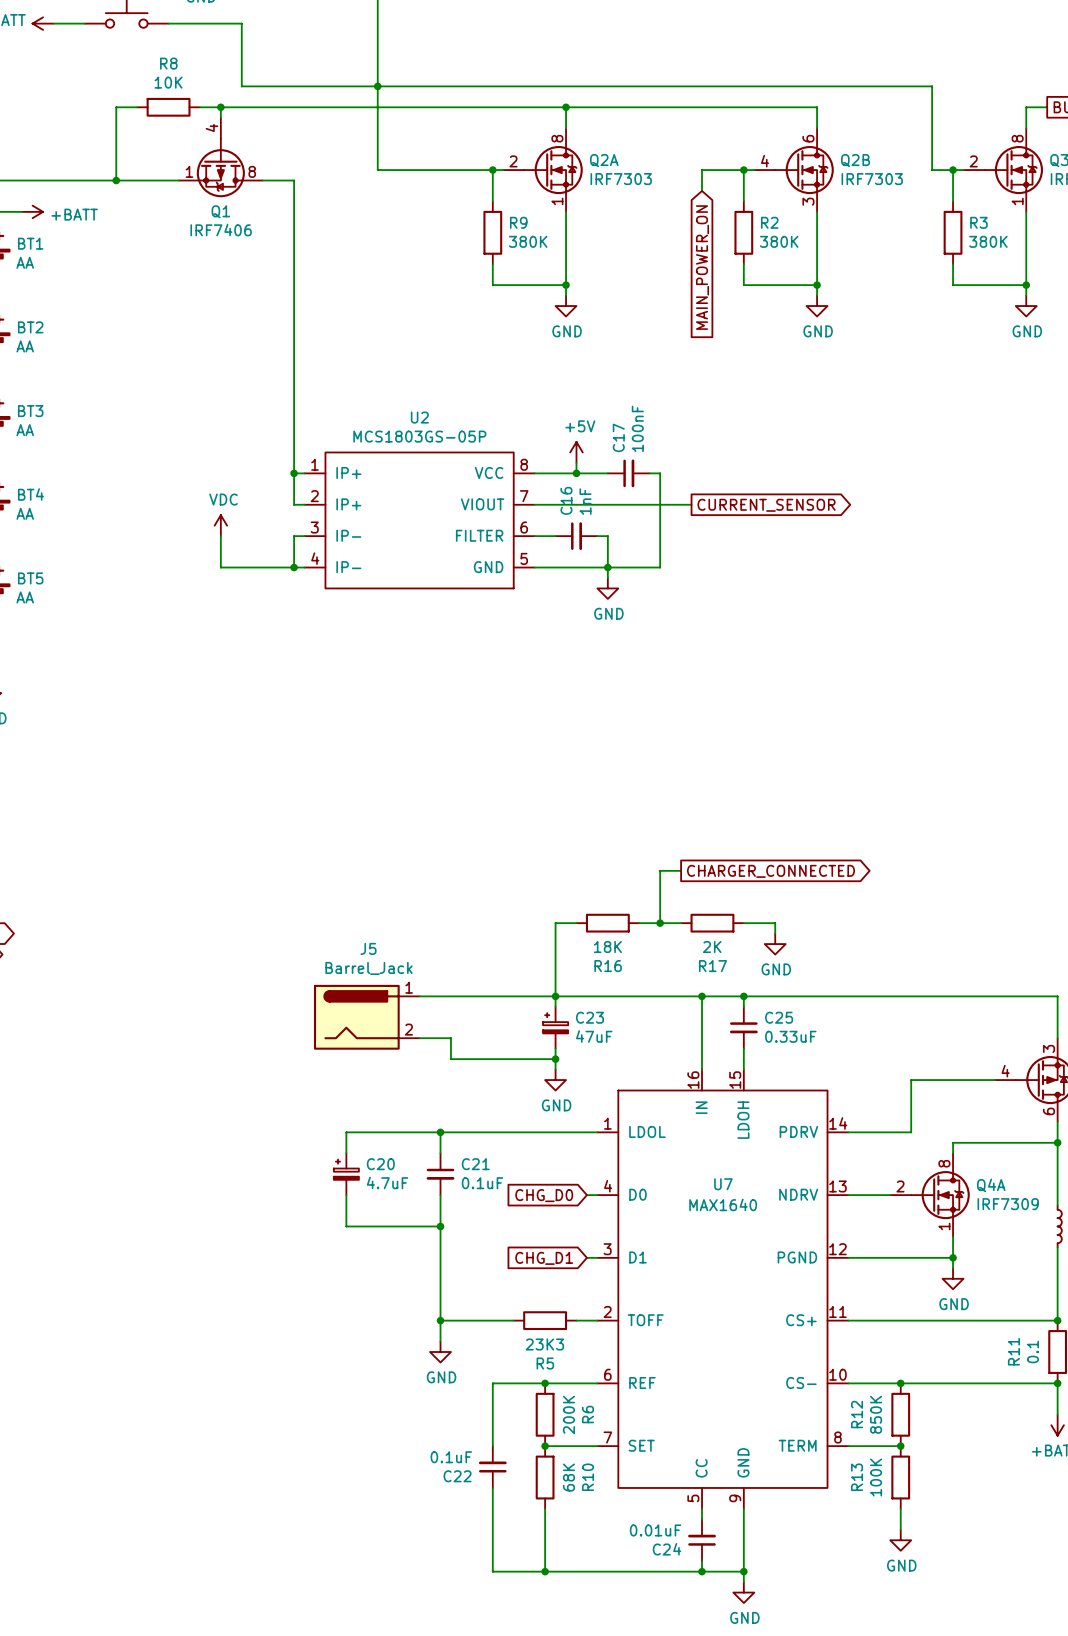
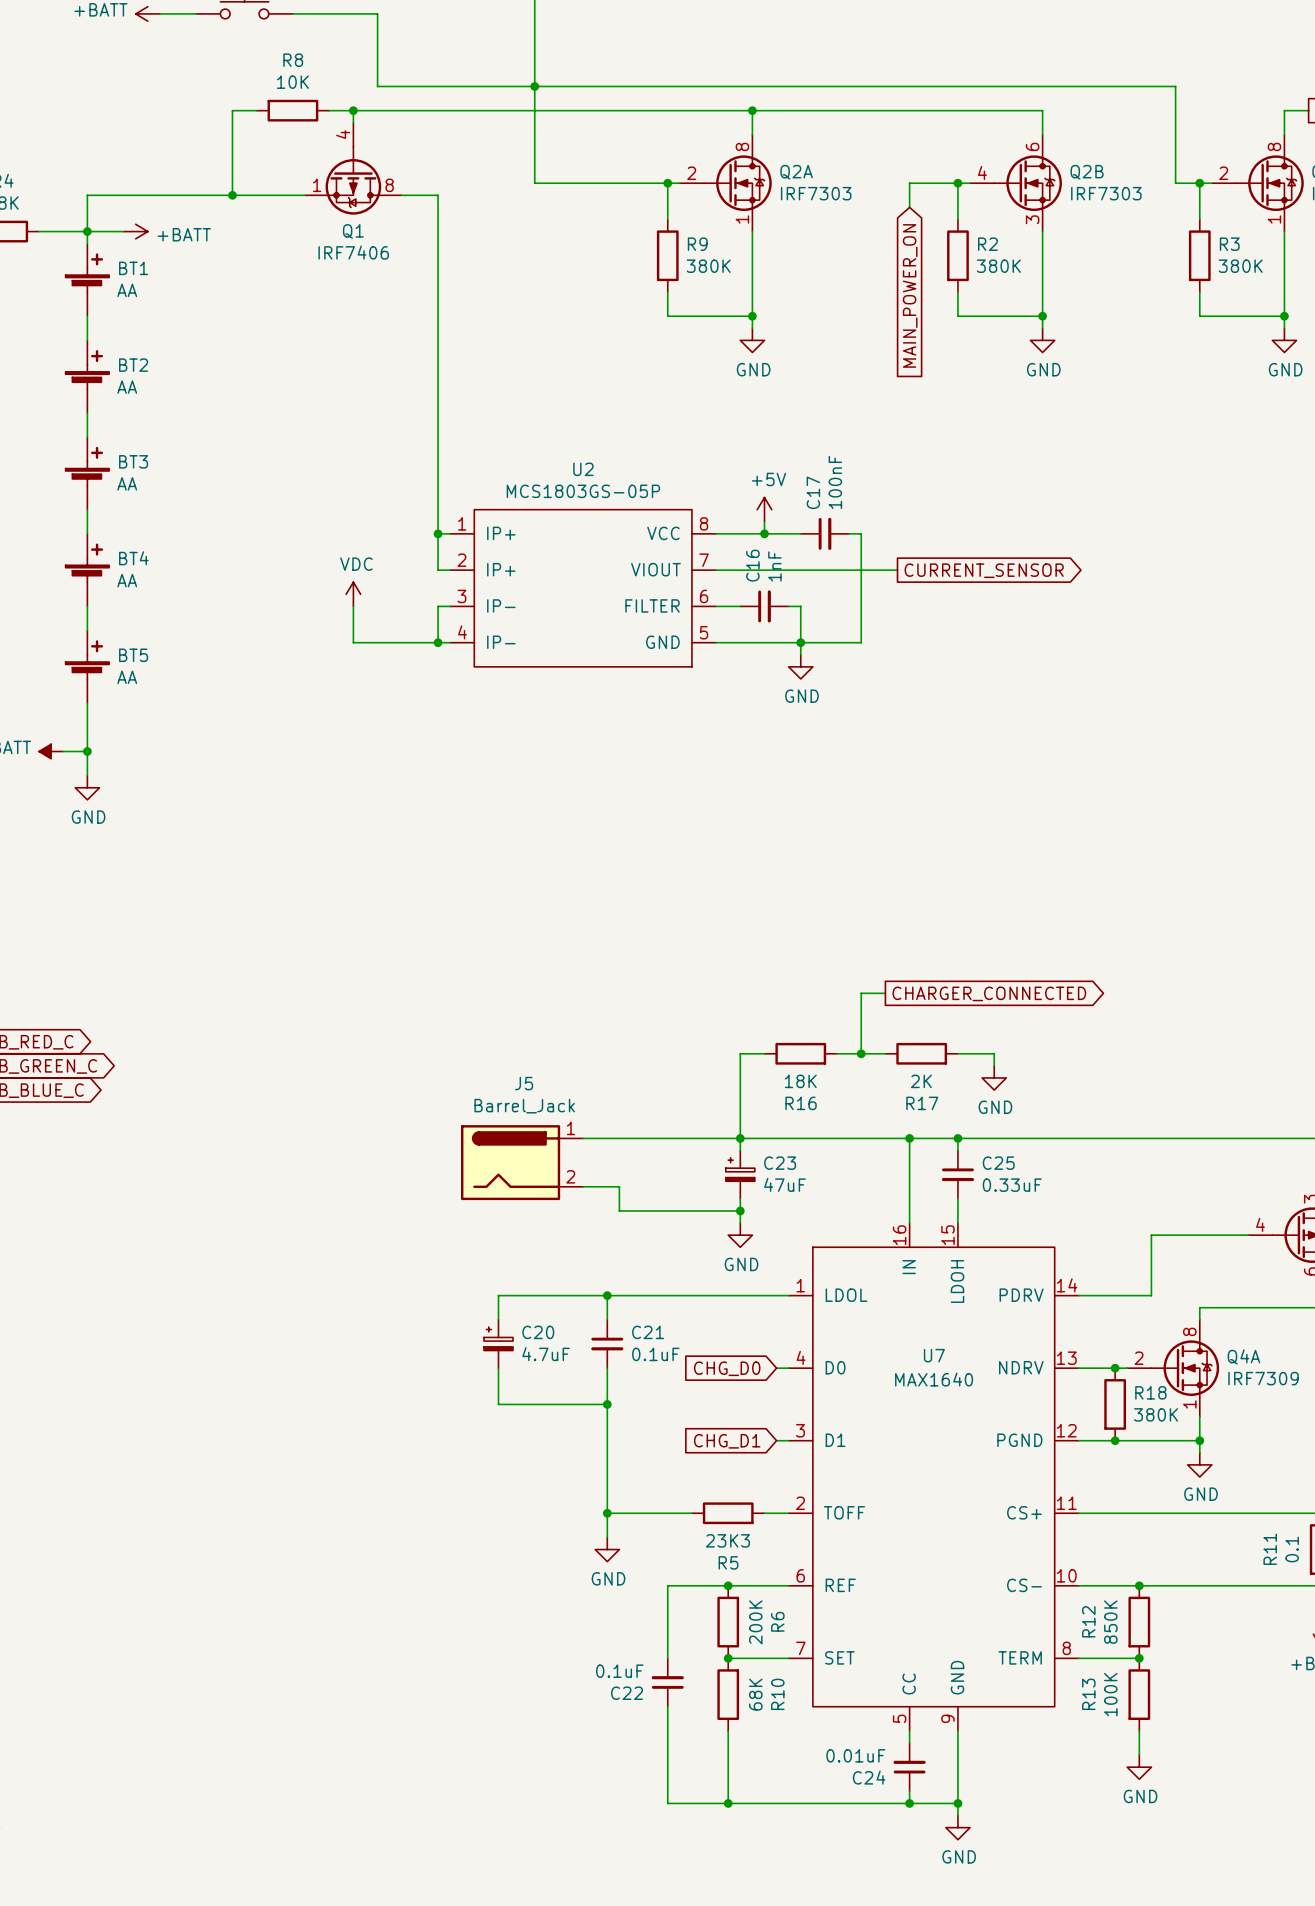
junction: none -> (1115, 1368)
R18: none -> 380K (1115, 1404)
junction: none -> (1115, 1440)

